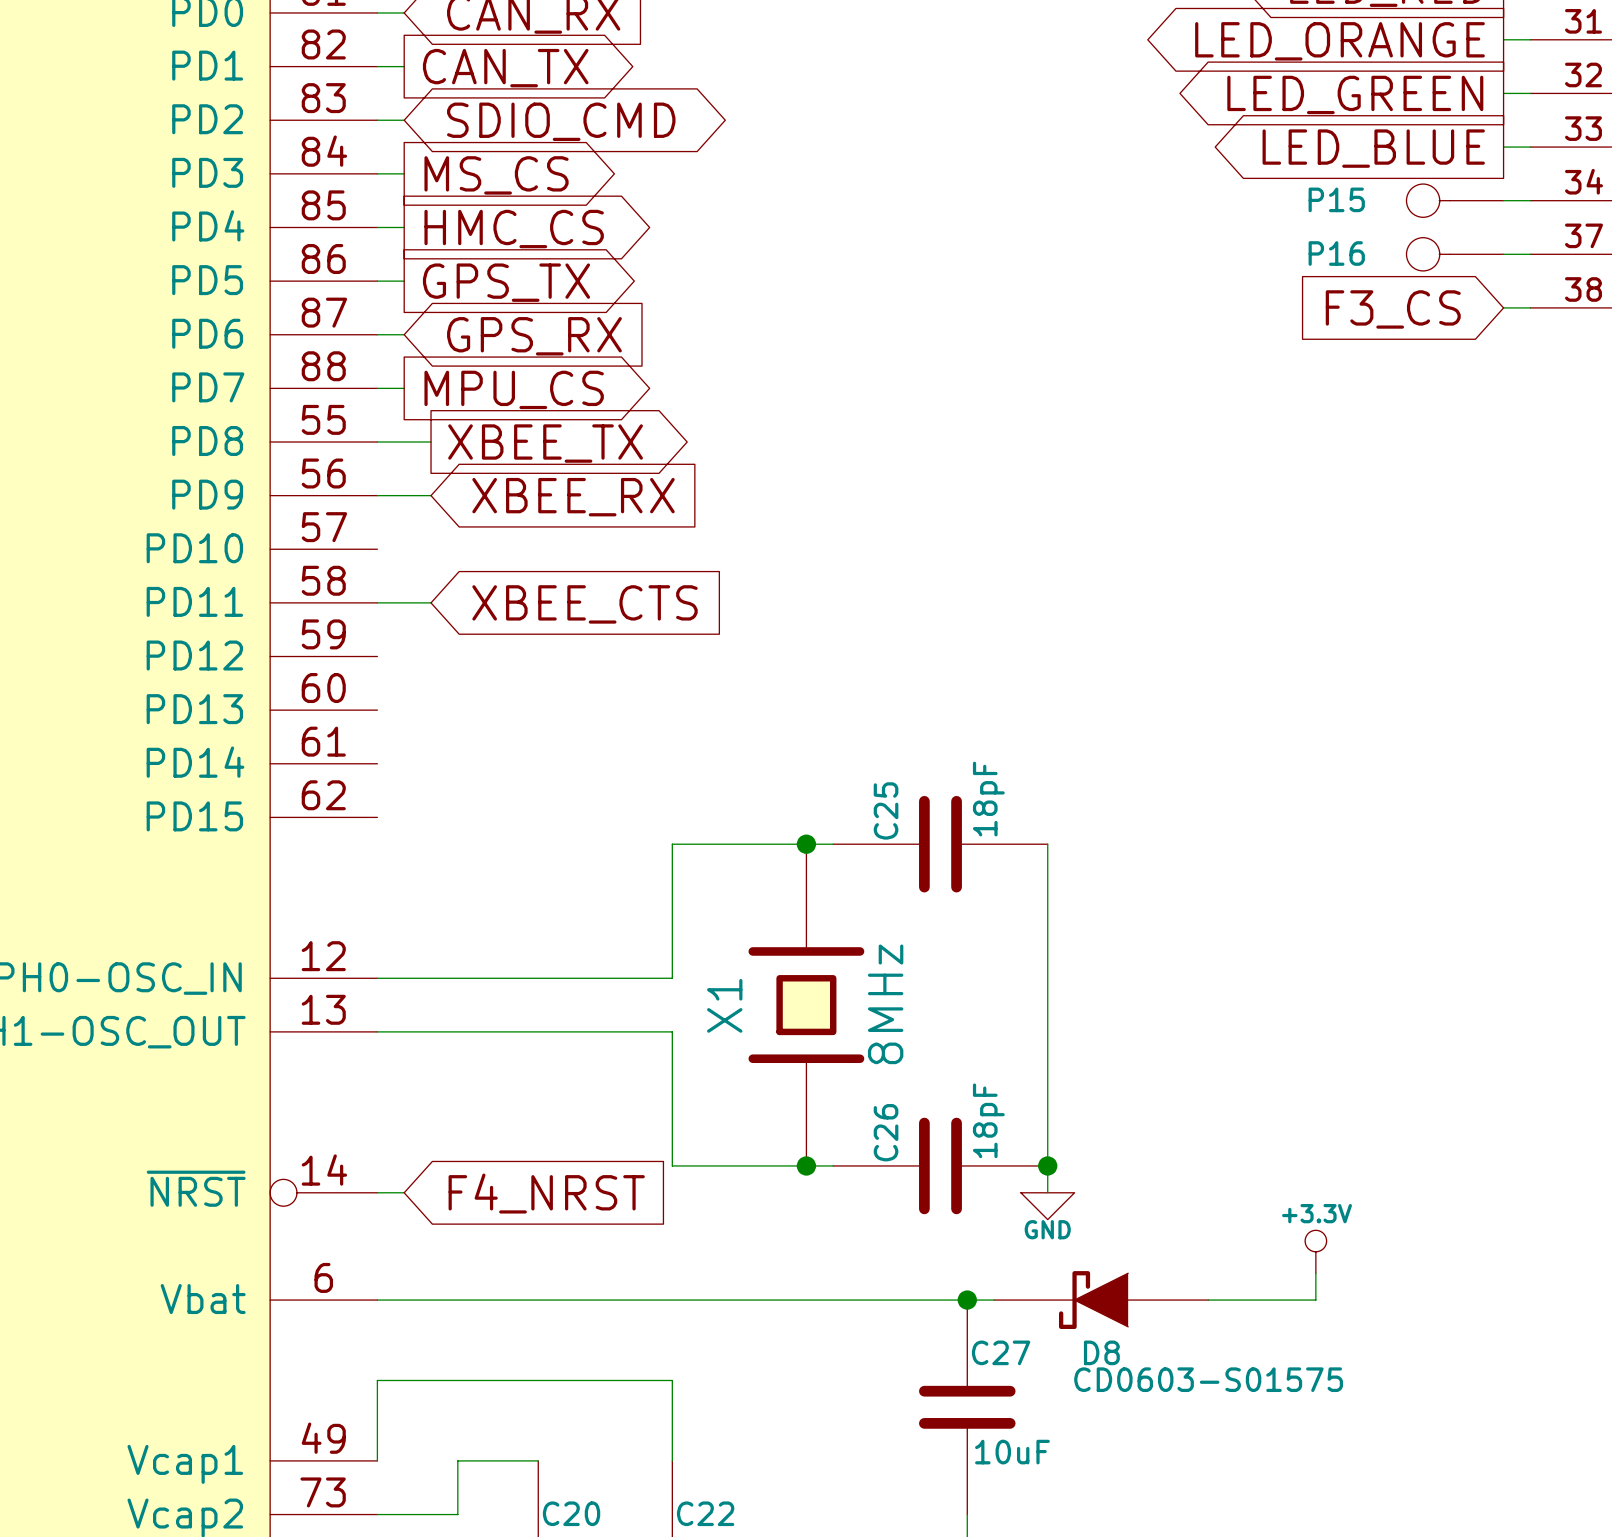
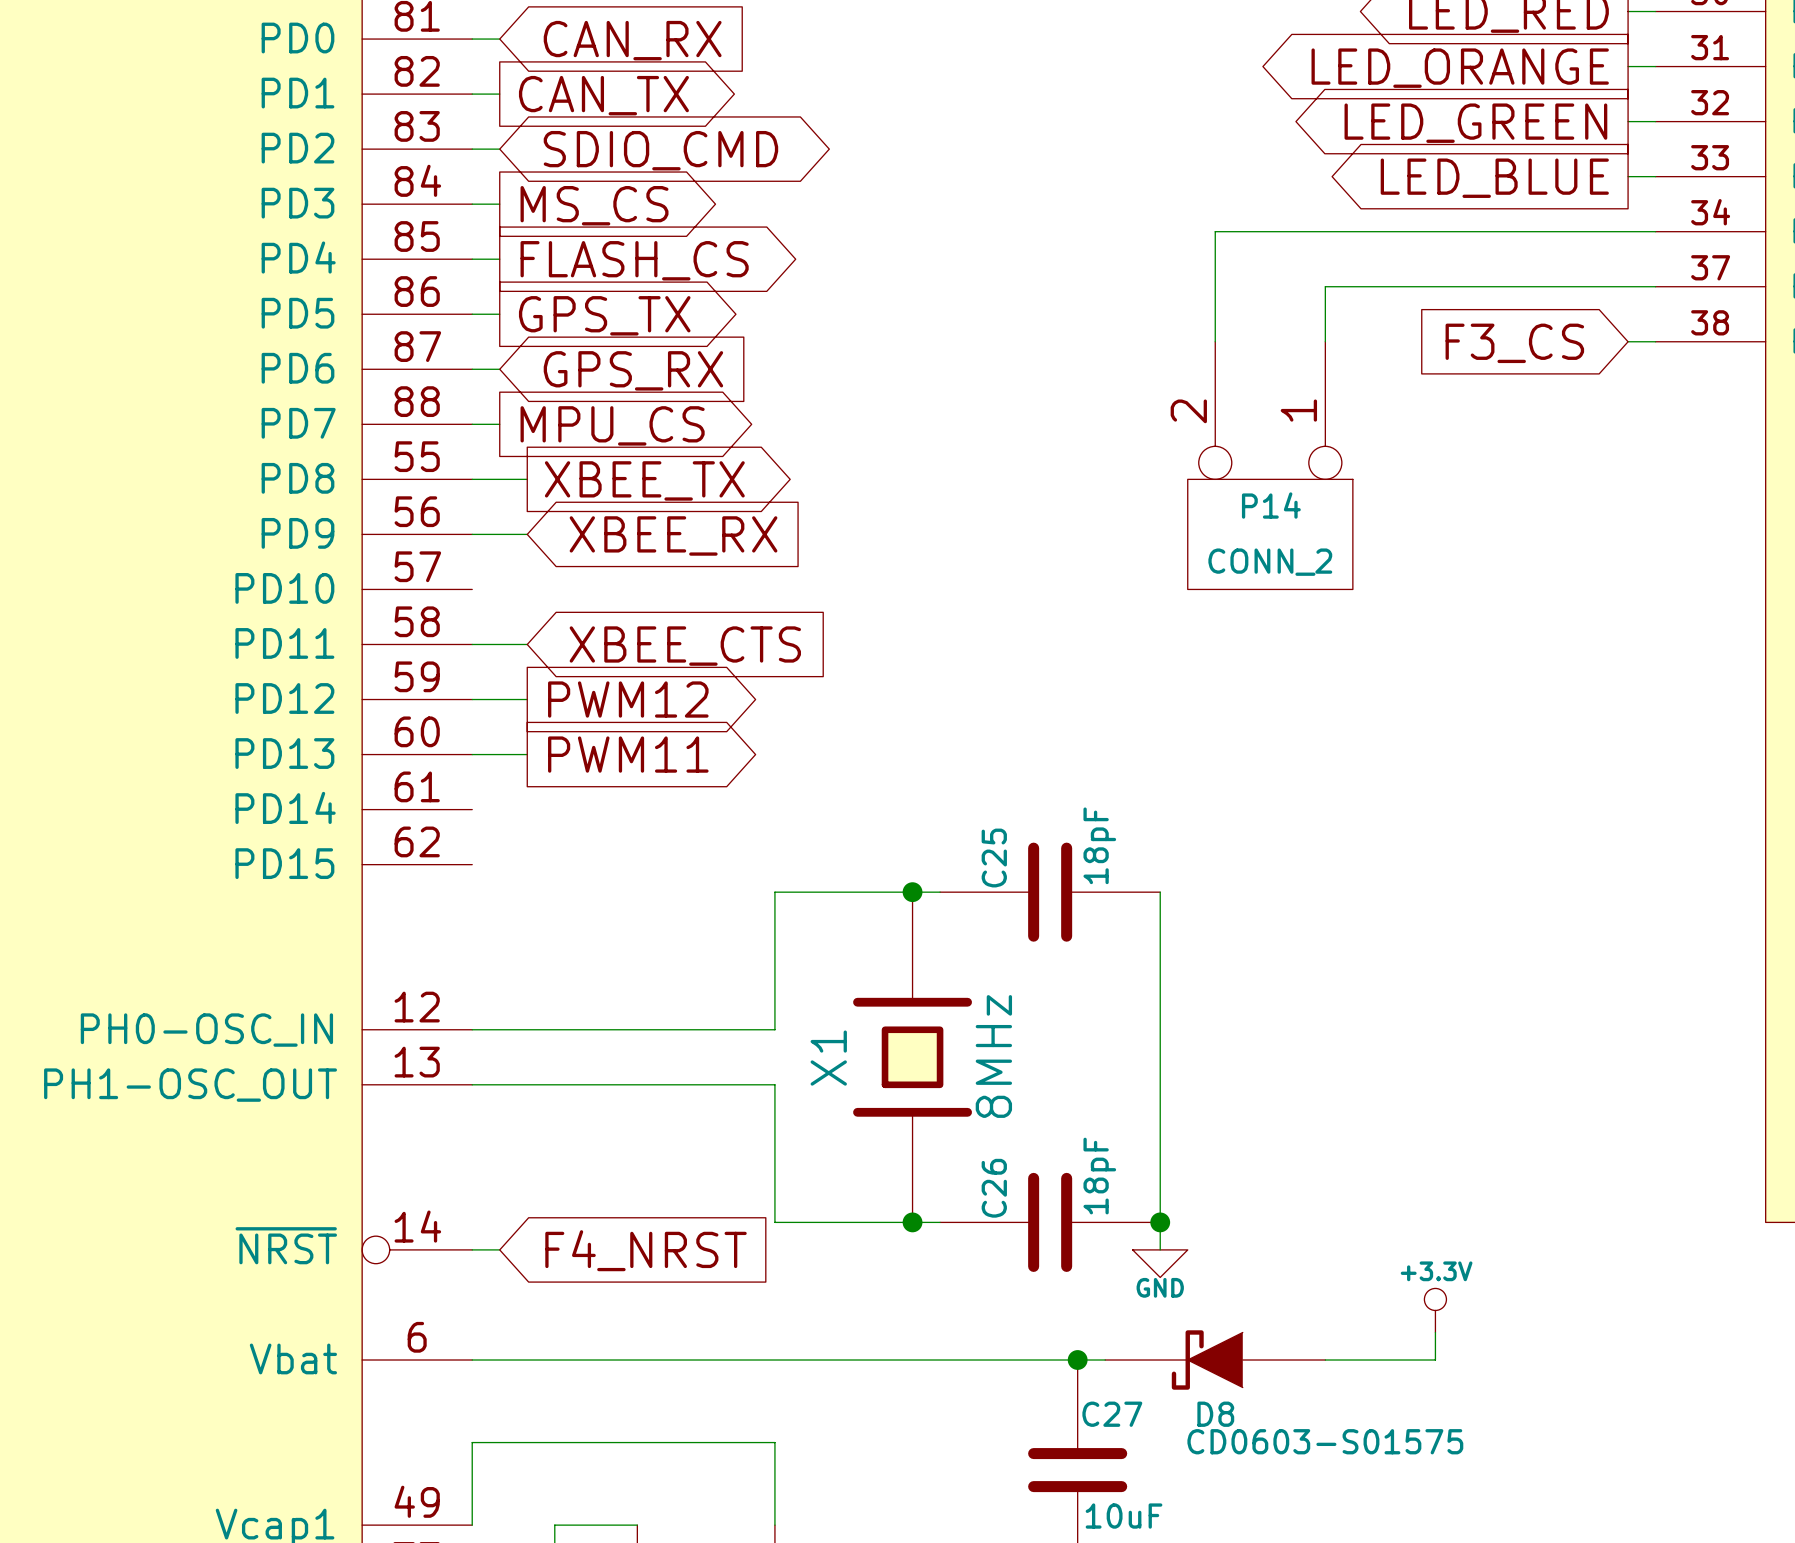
P15: (1455, 200) -> none
wire: none -> (1628, 231) (1215, 231) (1215, 341)
global label: HMC_CS (514, 229) -> FLASH_CS (634, 260)
P16: (1455, 254) -> none
wire: none -> (1628, 286) (1325, 286) (1325, 341)
P14: none -> CONN_2 (1270, 465)
wire: none -> (472, 699) (527, 699)
global label: none -> PWM12 (628, 699)
wire: none -> (472, 754) (527, 754)
global label: none -> PWM11 (628, 754)

